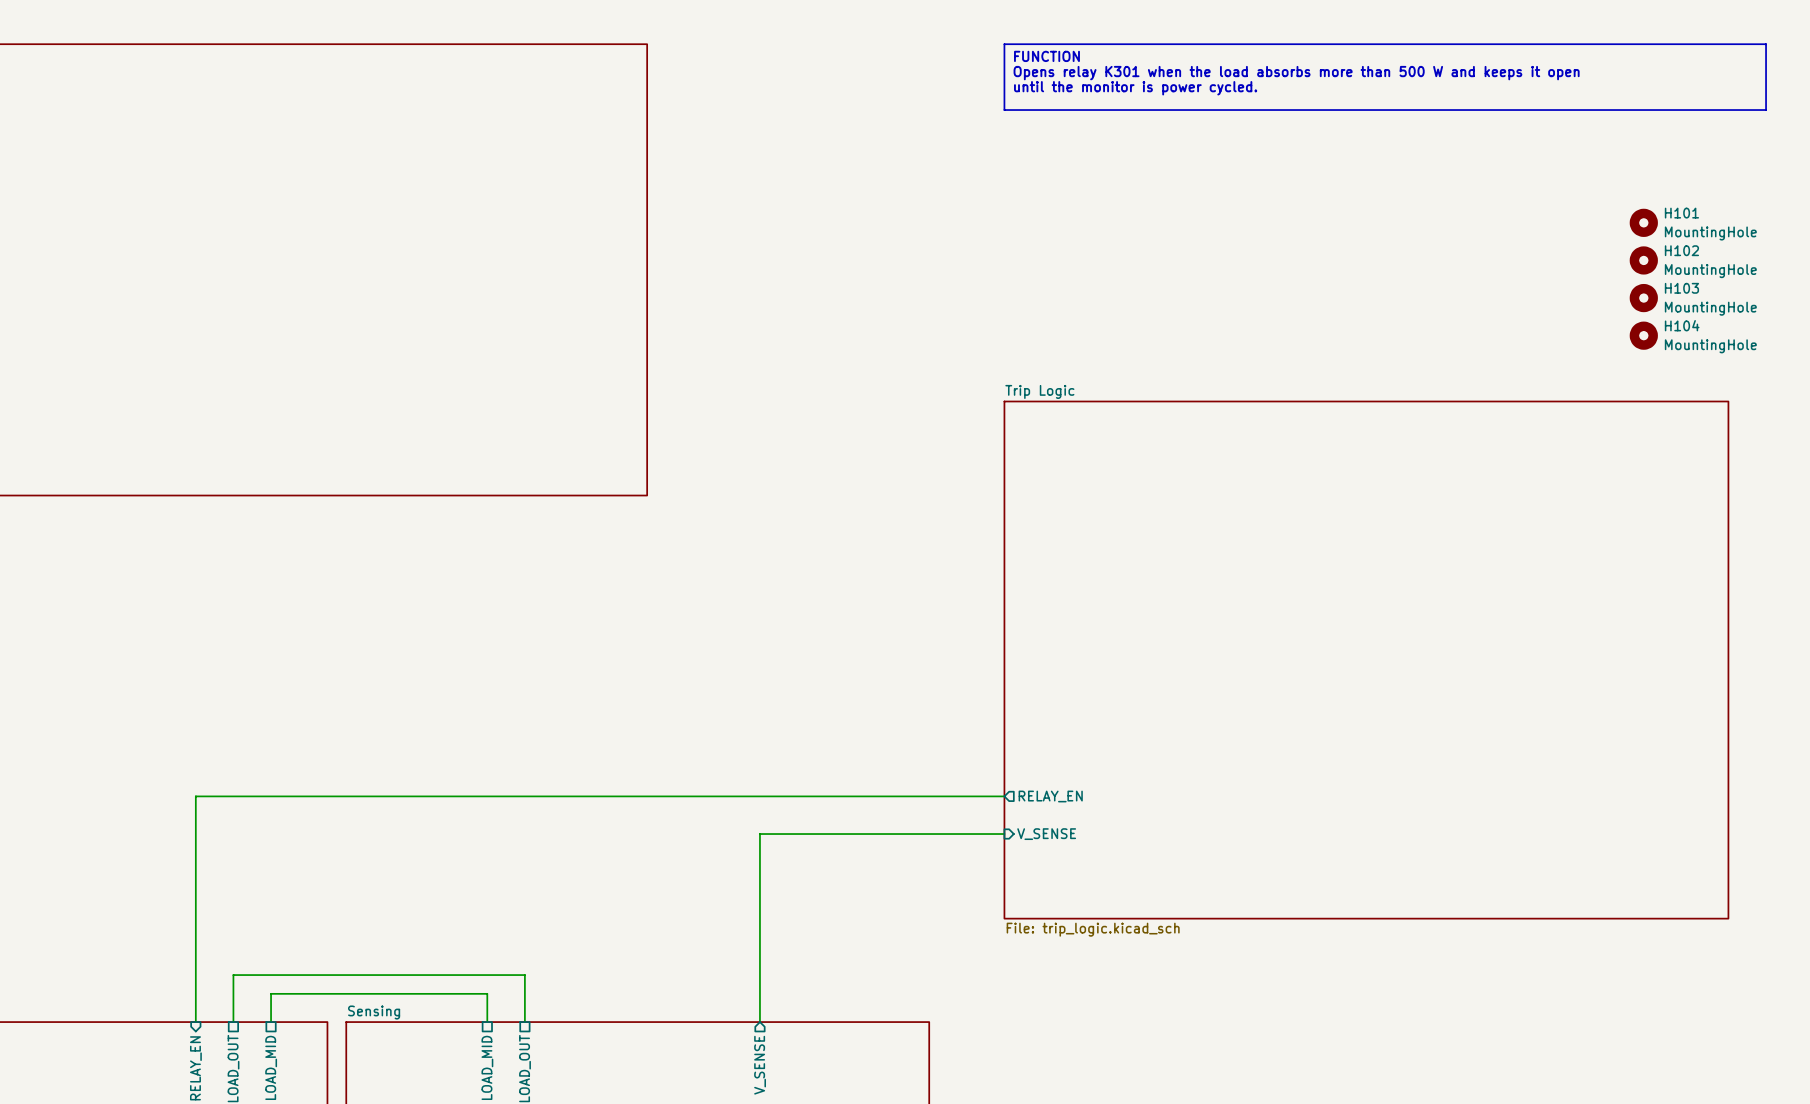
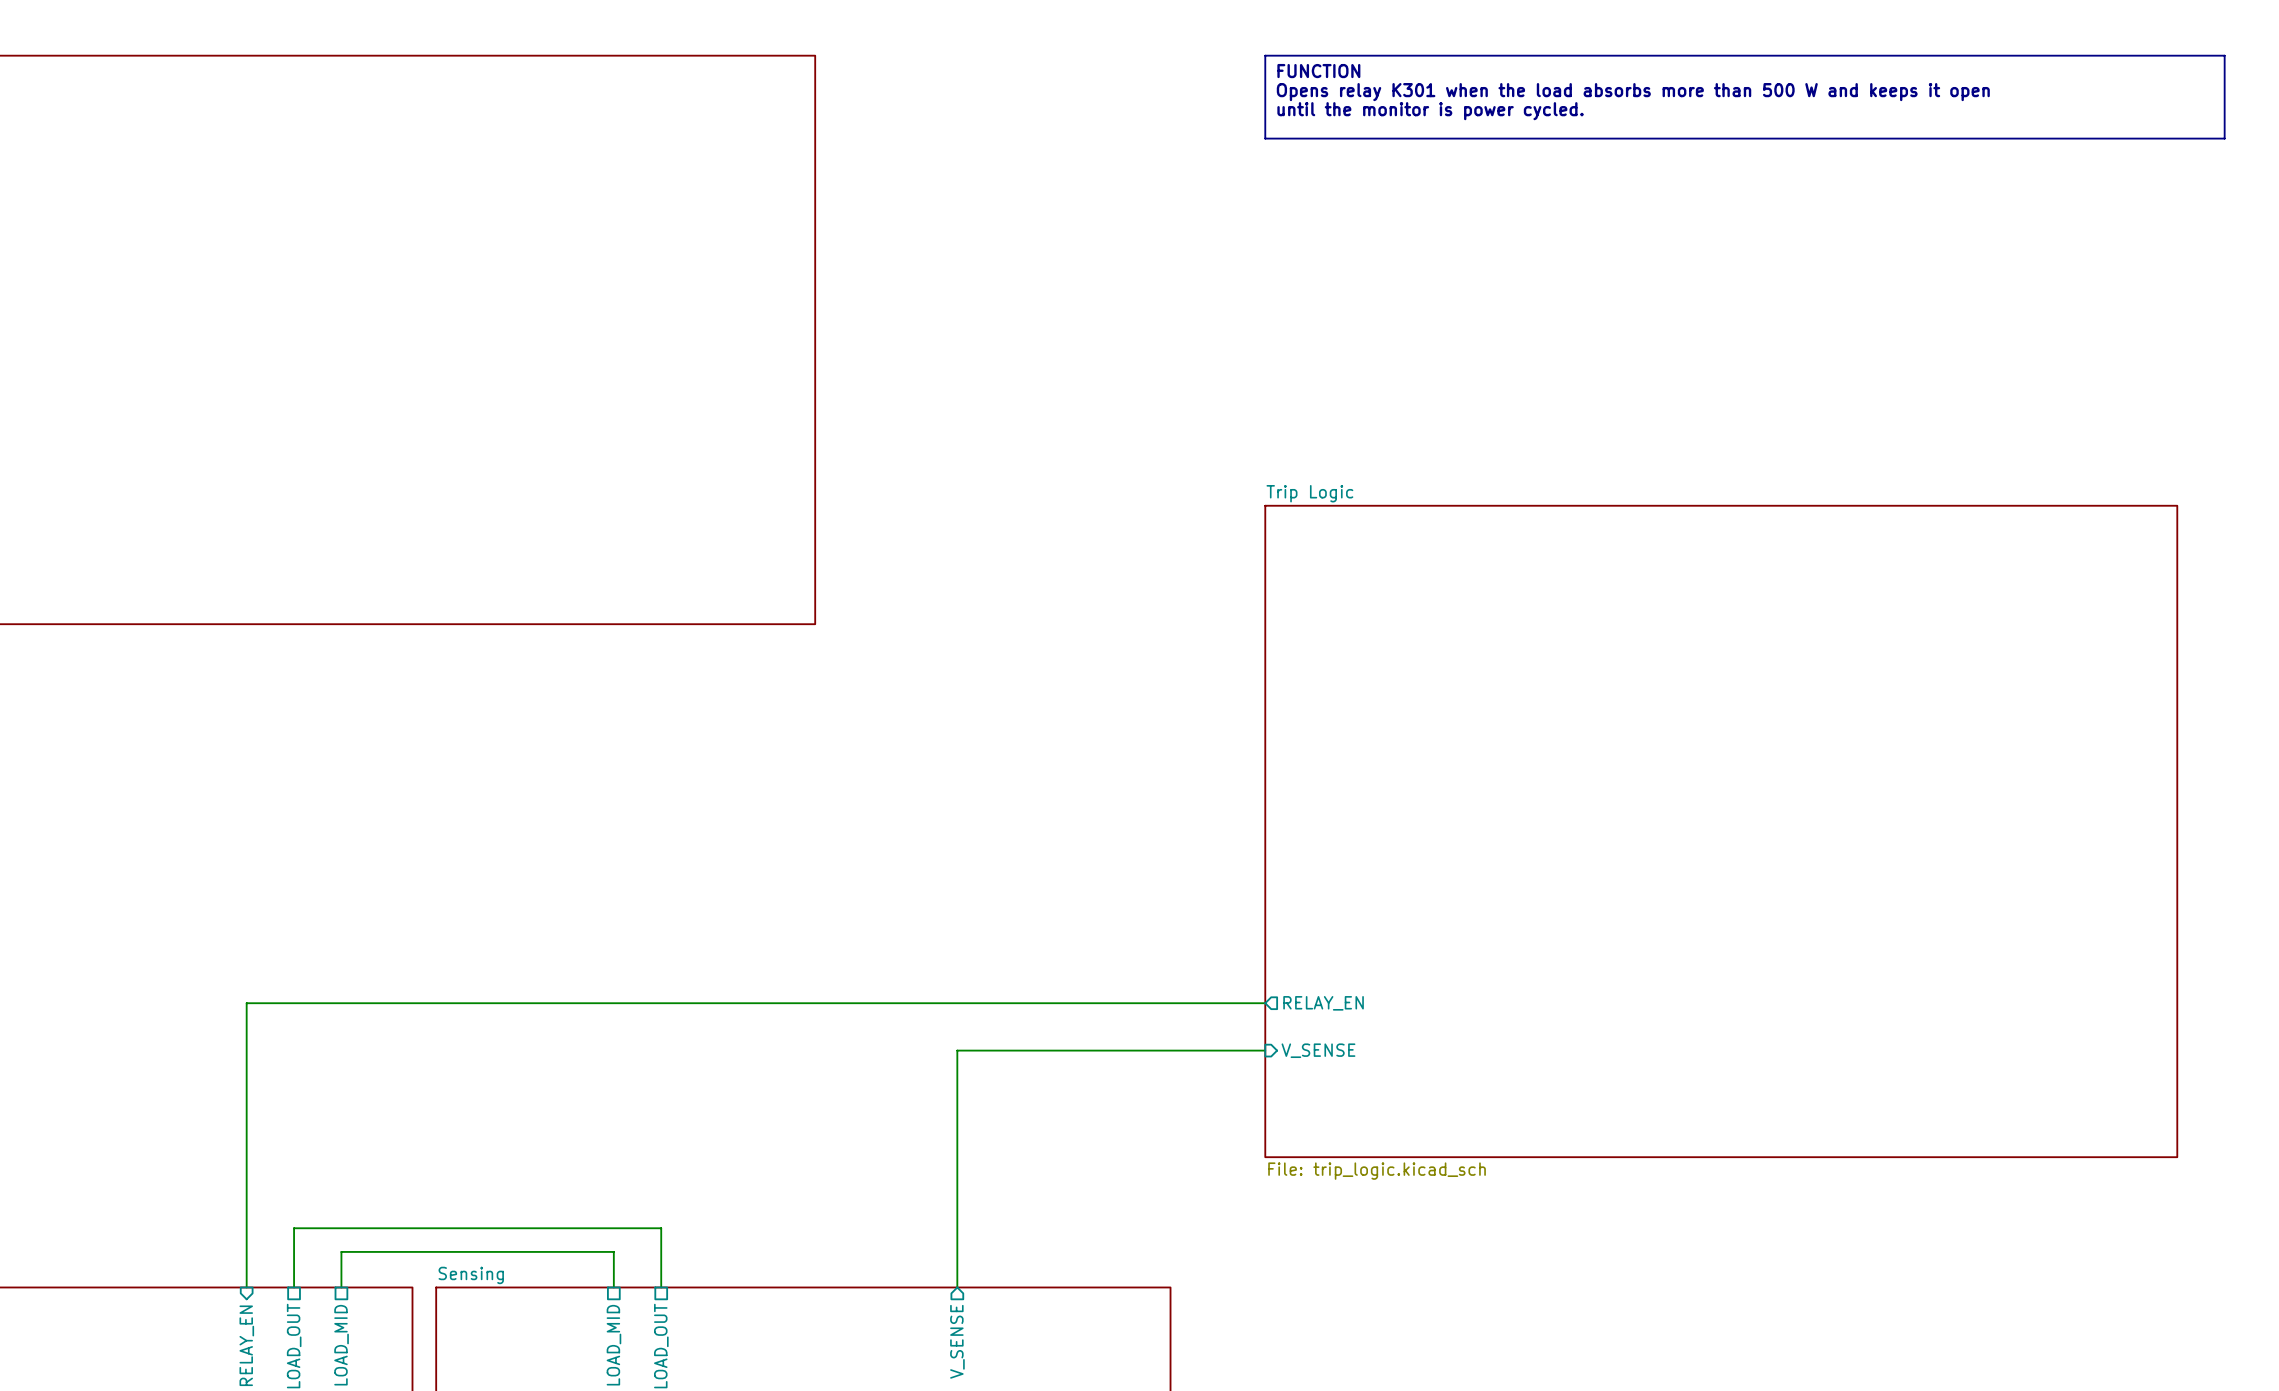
H101: MountingHole (1643, 222) -> none
H102: MountingHole (1643, 260) -> none
H103: MountingHole (1643, 298) -> none
H104: MountingHole (1643, 335) -> none

